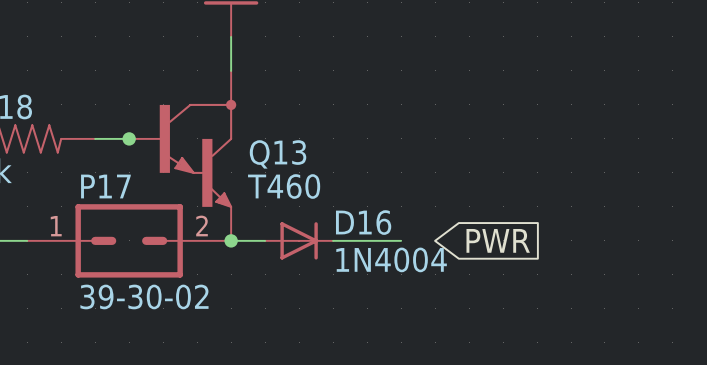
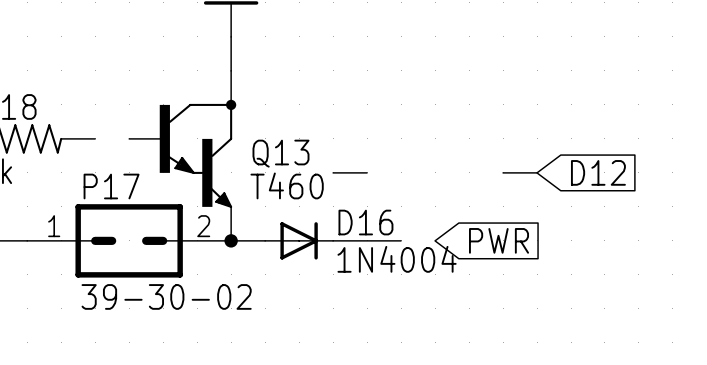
wire: (95, 138) (129, 138) -> (333, 172) (367, 172)
junction: (129, 138) -> none
wire: none -> (503, 172) (537, 172)
global label: none -> D12 (598, 172)

